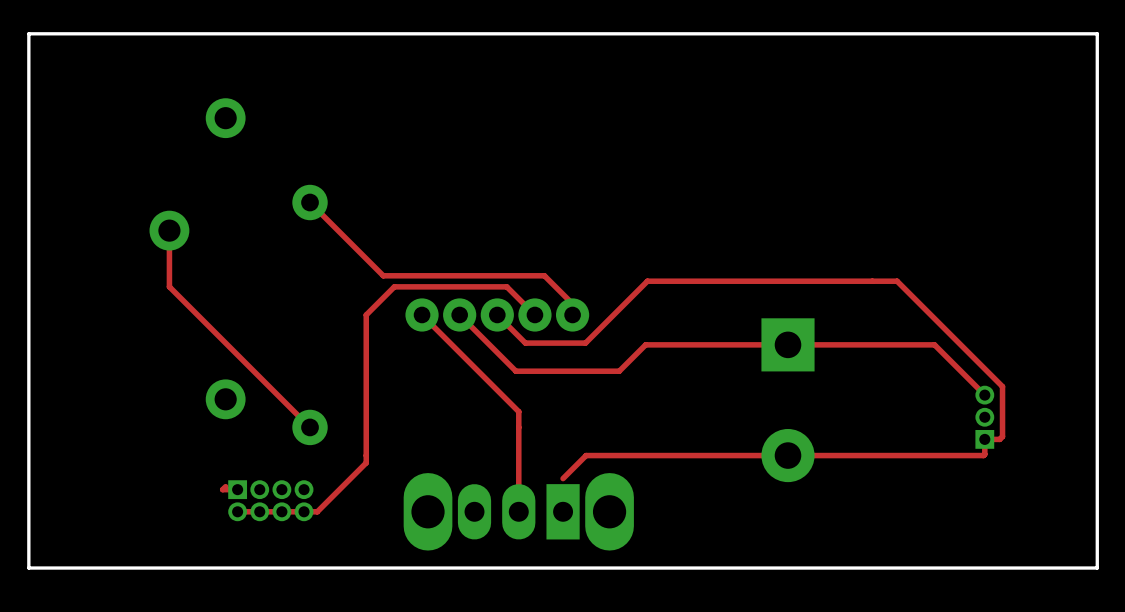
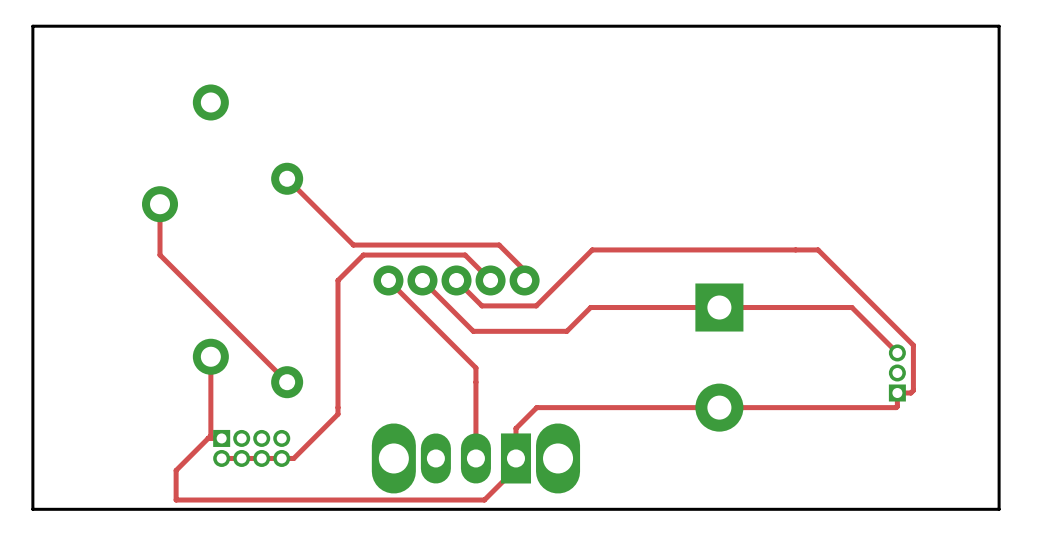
top track: none -> (210, 356) (210, 435)
top track: none -> (515, 428) (515, 468) (484, 500) (176, 500) (176, 470) (208, 438)

